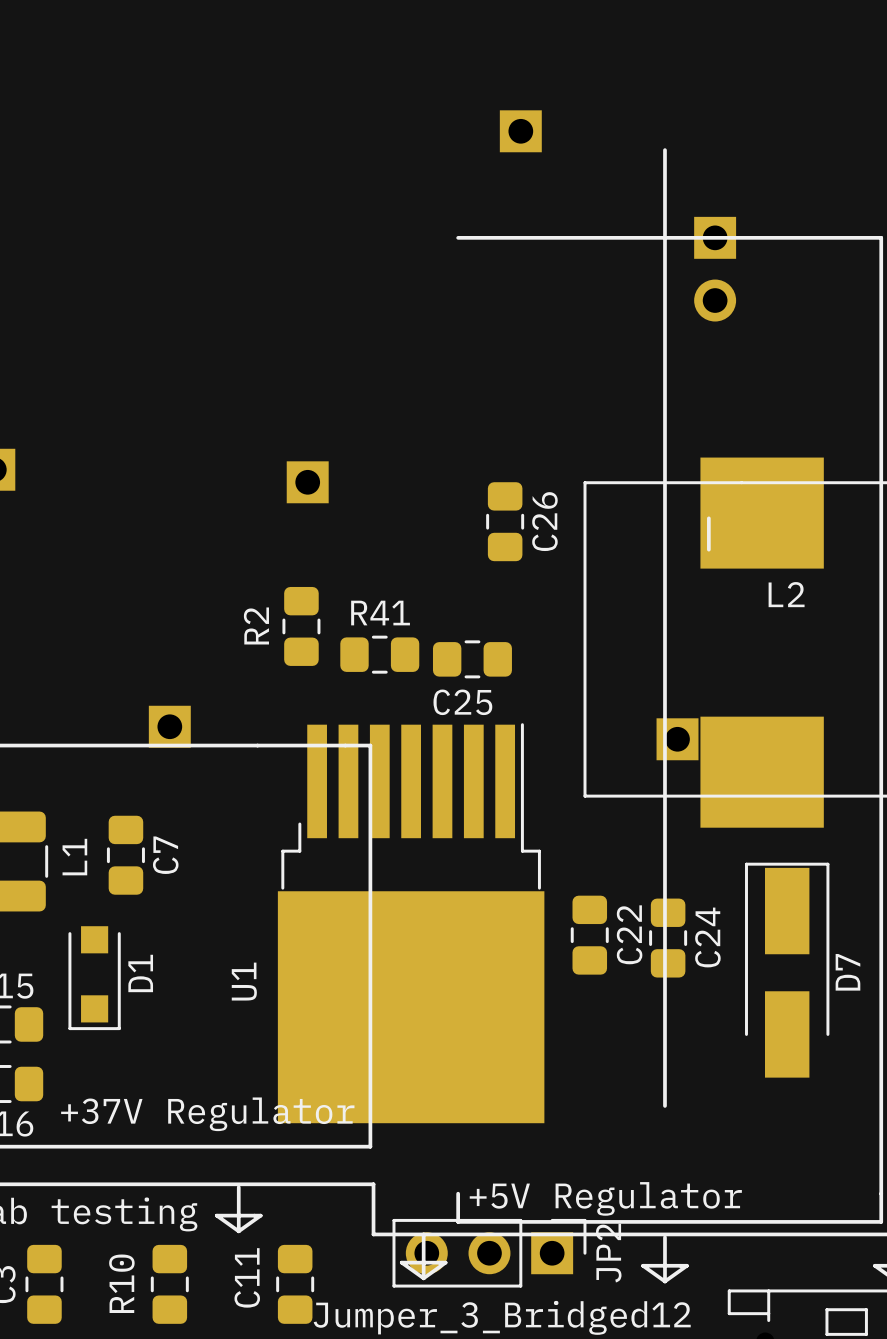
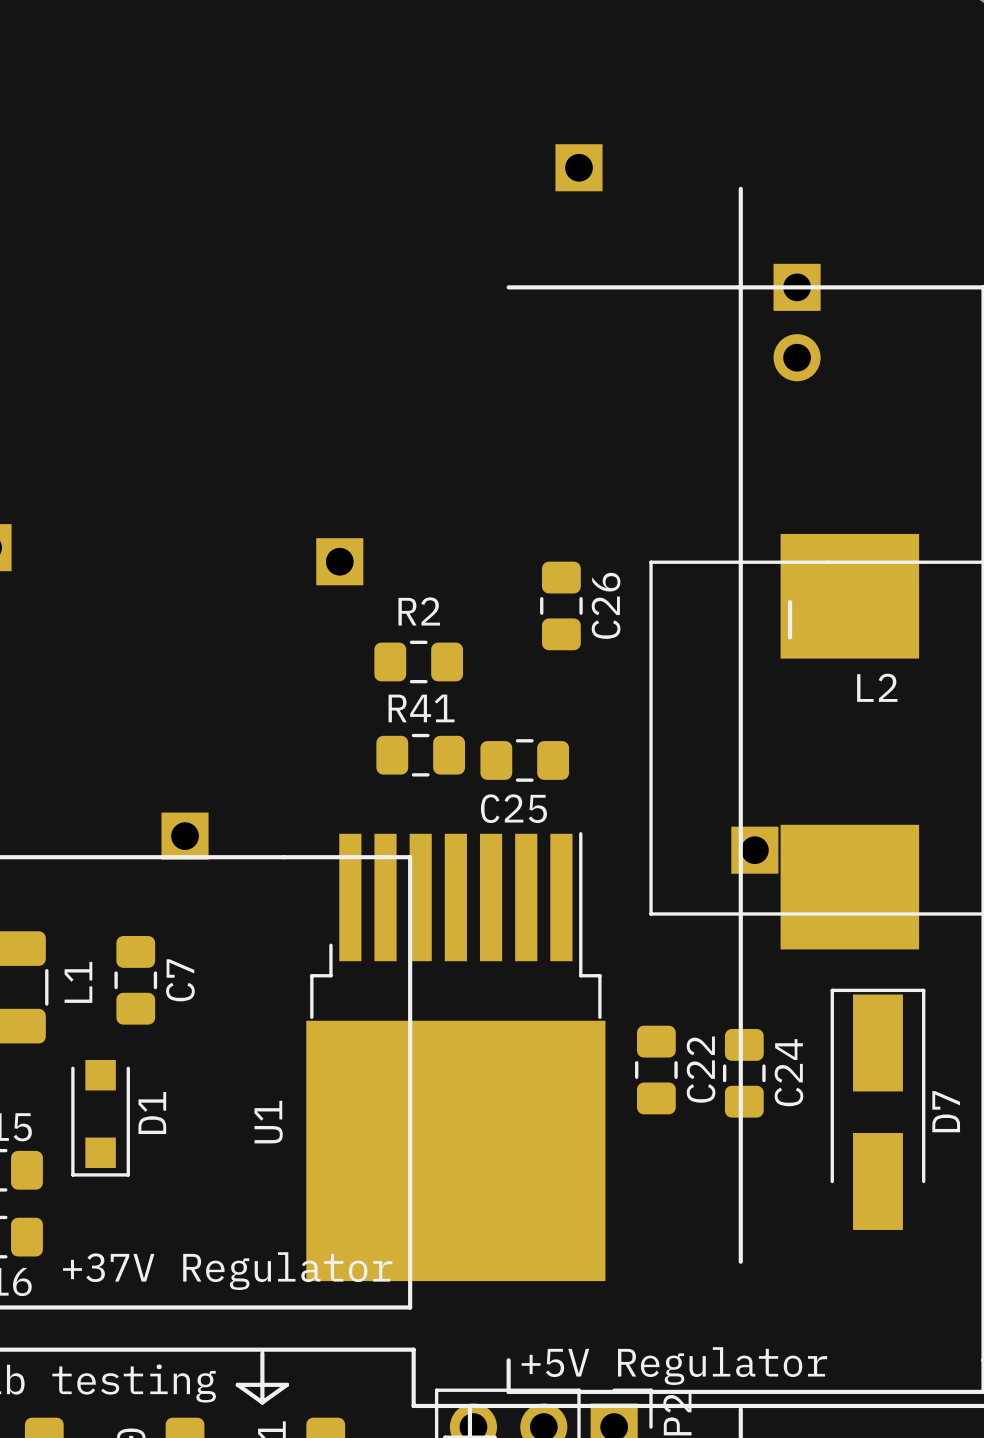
R2 rotation: 0° (301, 626) -> 90° clockwise (418, 661)
R2 position: (301, 626) -> (418, 661)

